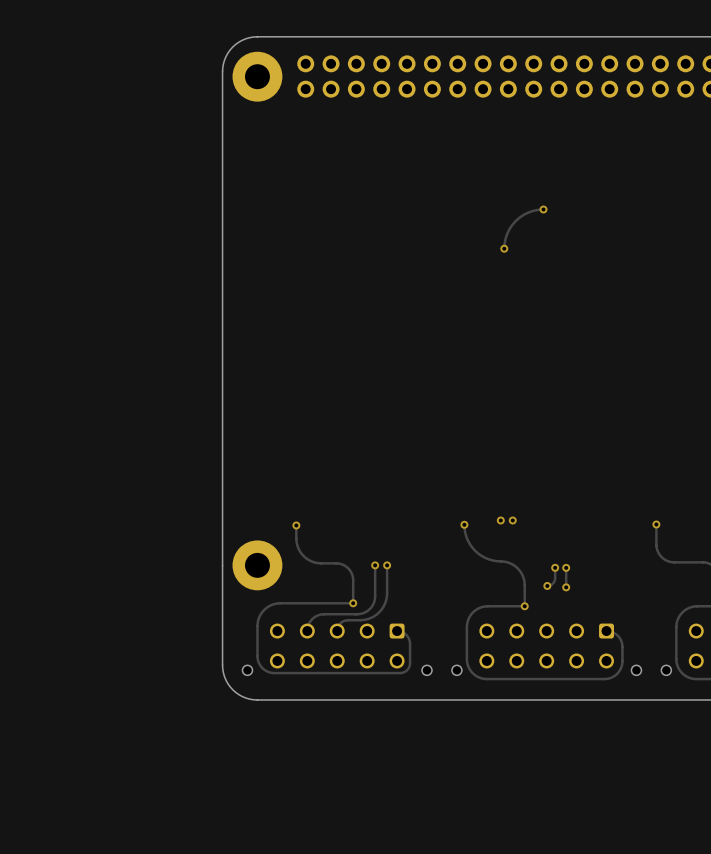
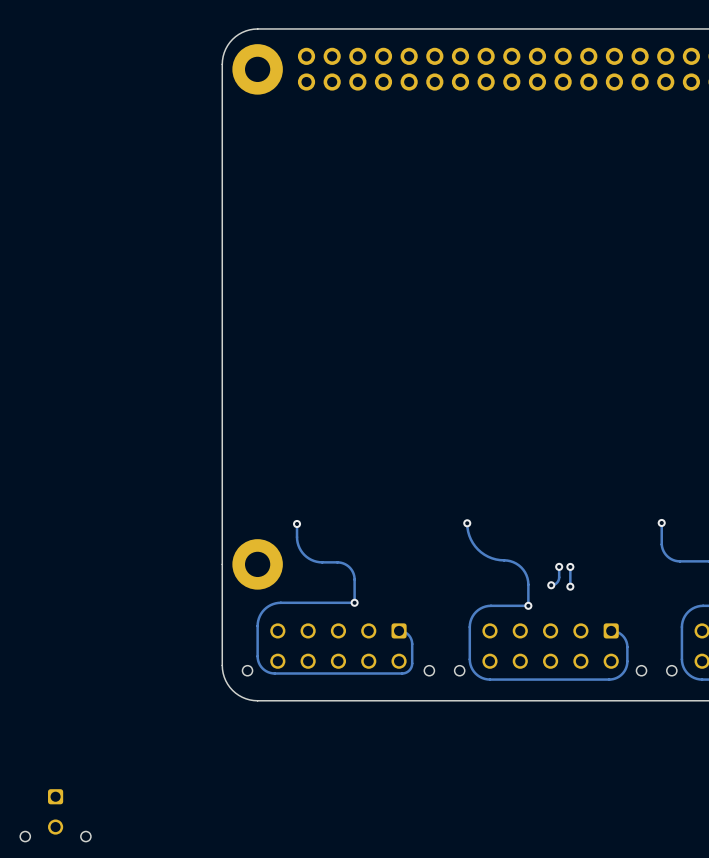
track: (543, 209) (528, 212) (515, 220) (507, 233) (504, 248) -> none
via: (543, 209) -> none
via: (504, 248) -> none
via: (500, 520) -> none
via: (512, 520) -> none
track: (375, 565) (374, 598) (369, 608) (359, 614) (318, 615) (310, 620) (307, 631) -> none
via: (375, 565) -> none
track: (387, 565) (386, 596) (381, 609) (367, 619) (343, 621) (338, 625) (337, 631) -> none
via: (387, 565) -> none
part: none -> (55, 815)

